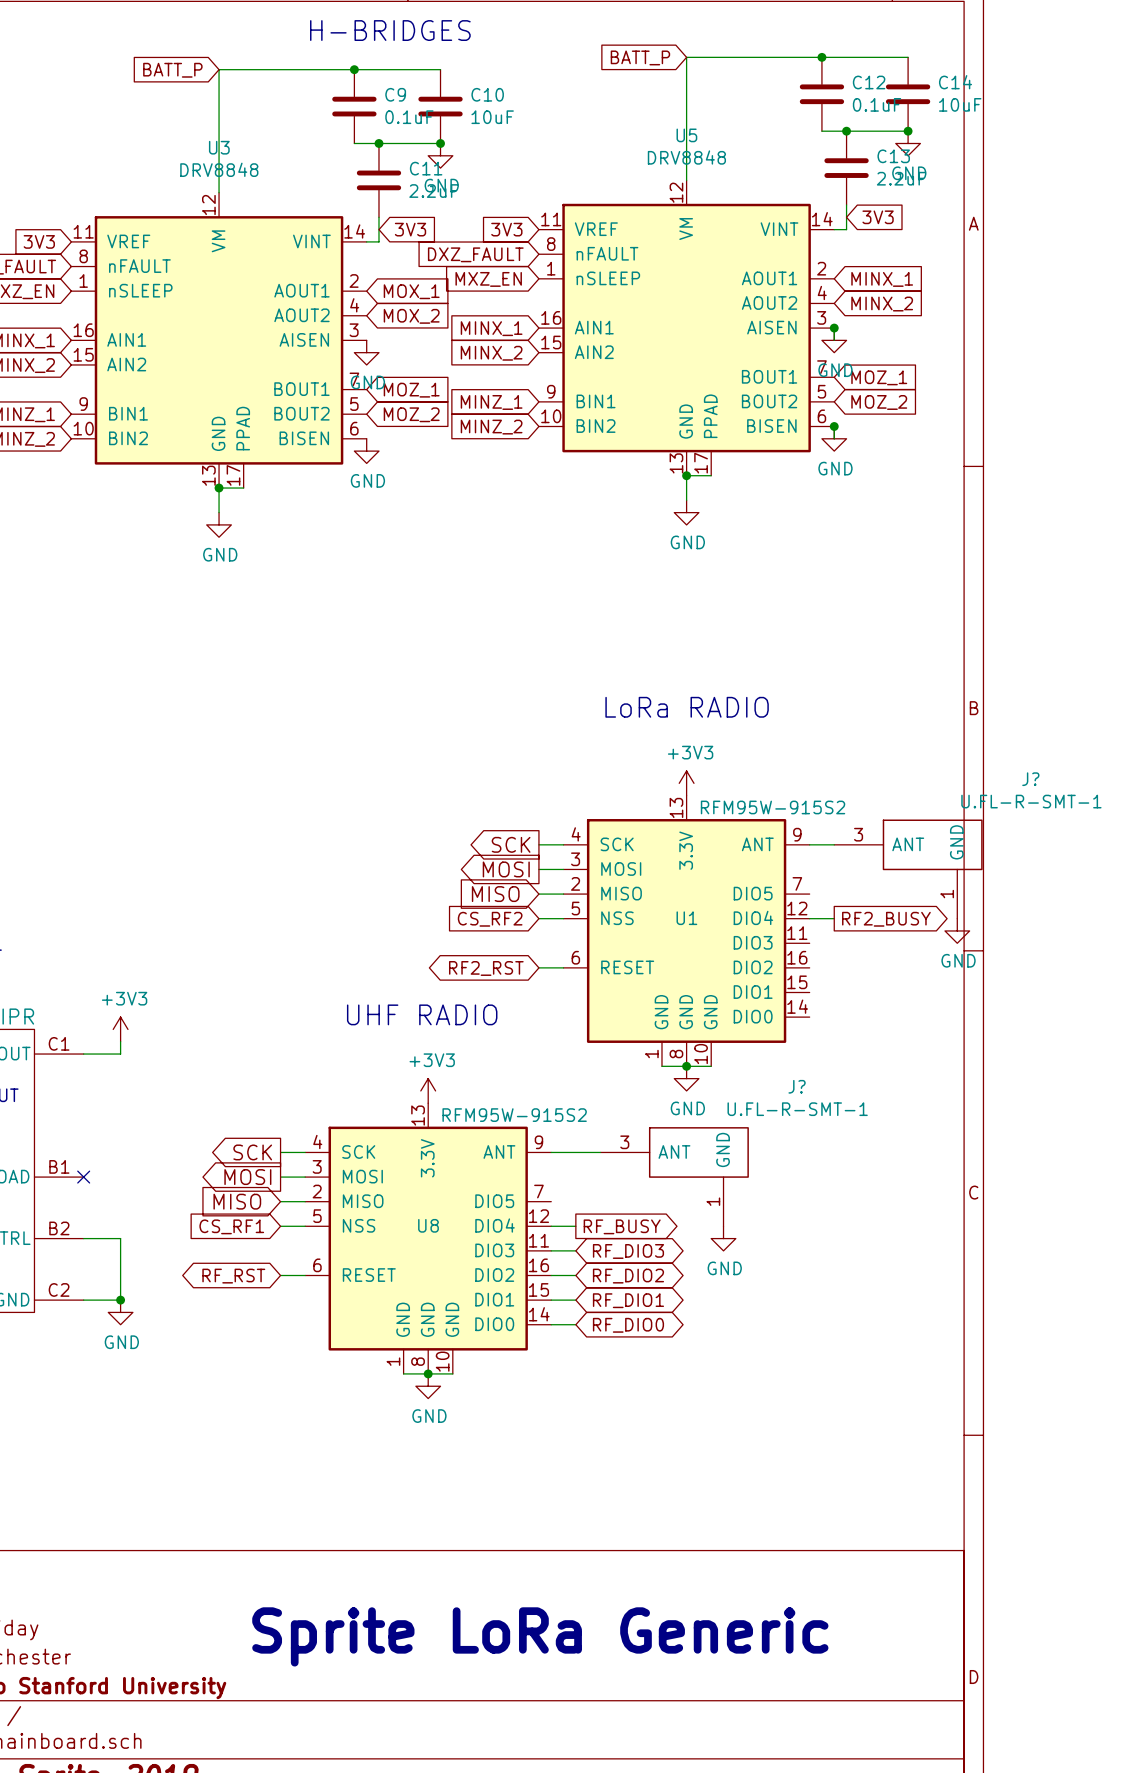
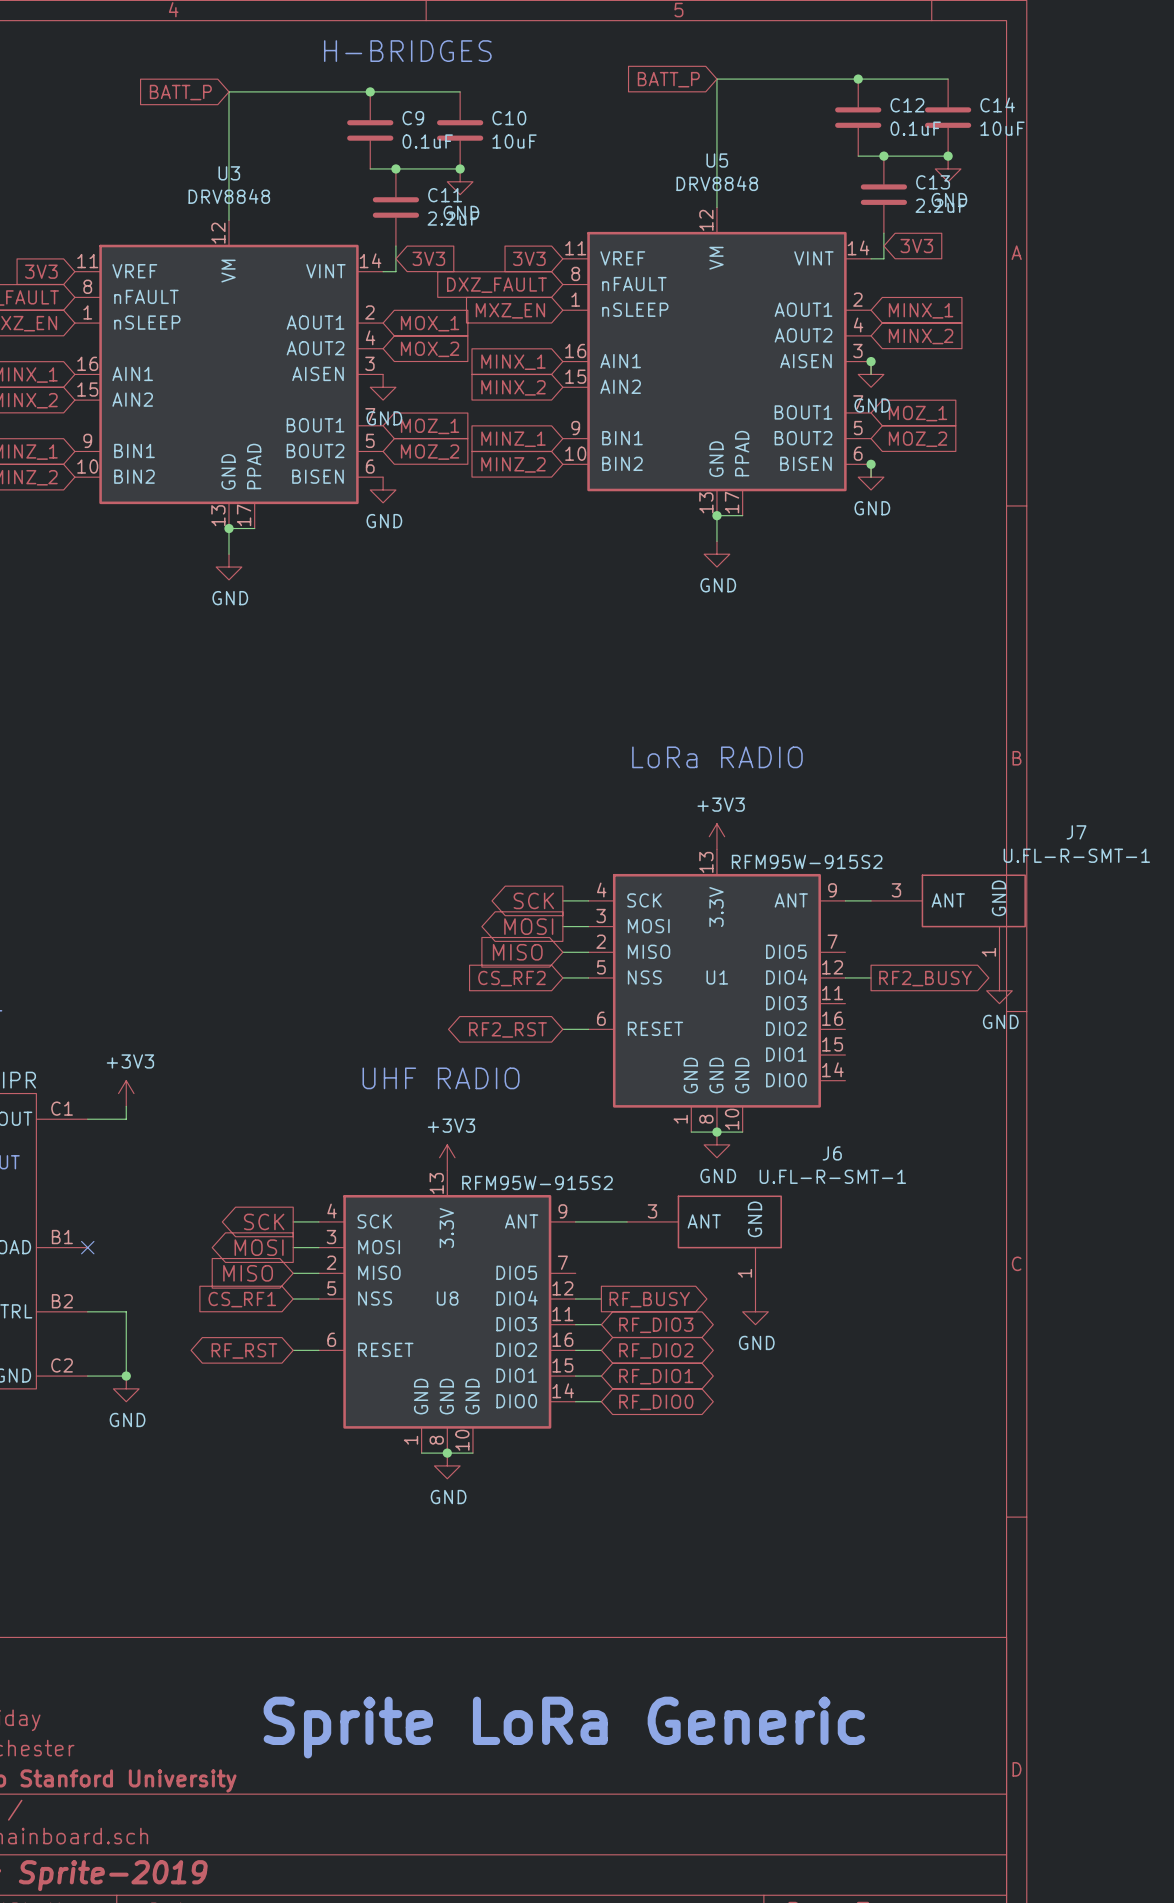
J? name: J? (1030, 779) -> J7 (1076, 832)
J? name: J? (797, 1086) -> J6 (832, 1153)

